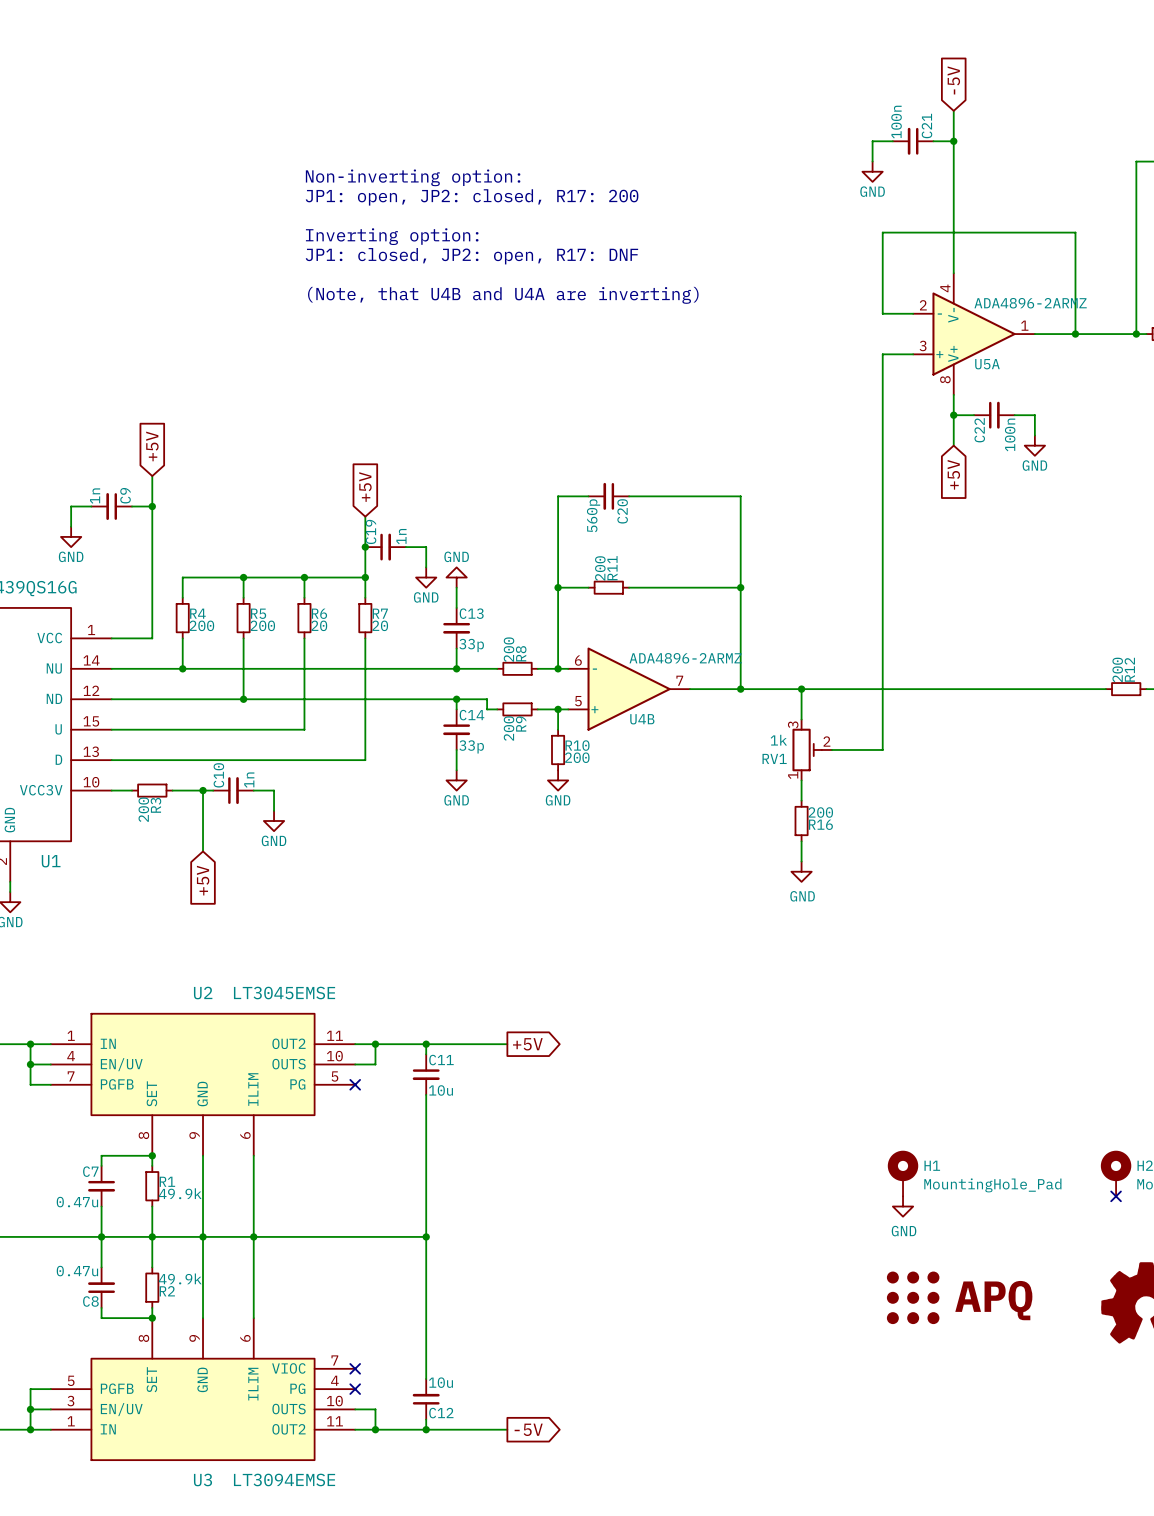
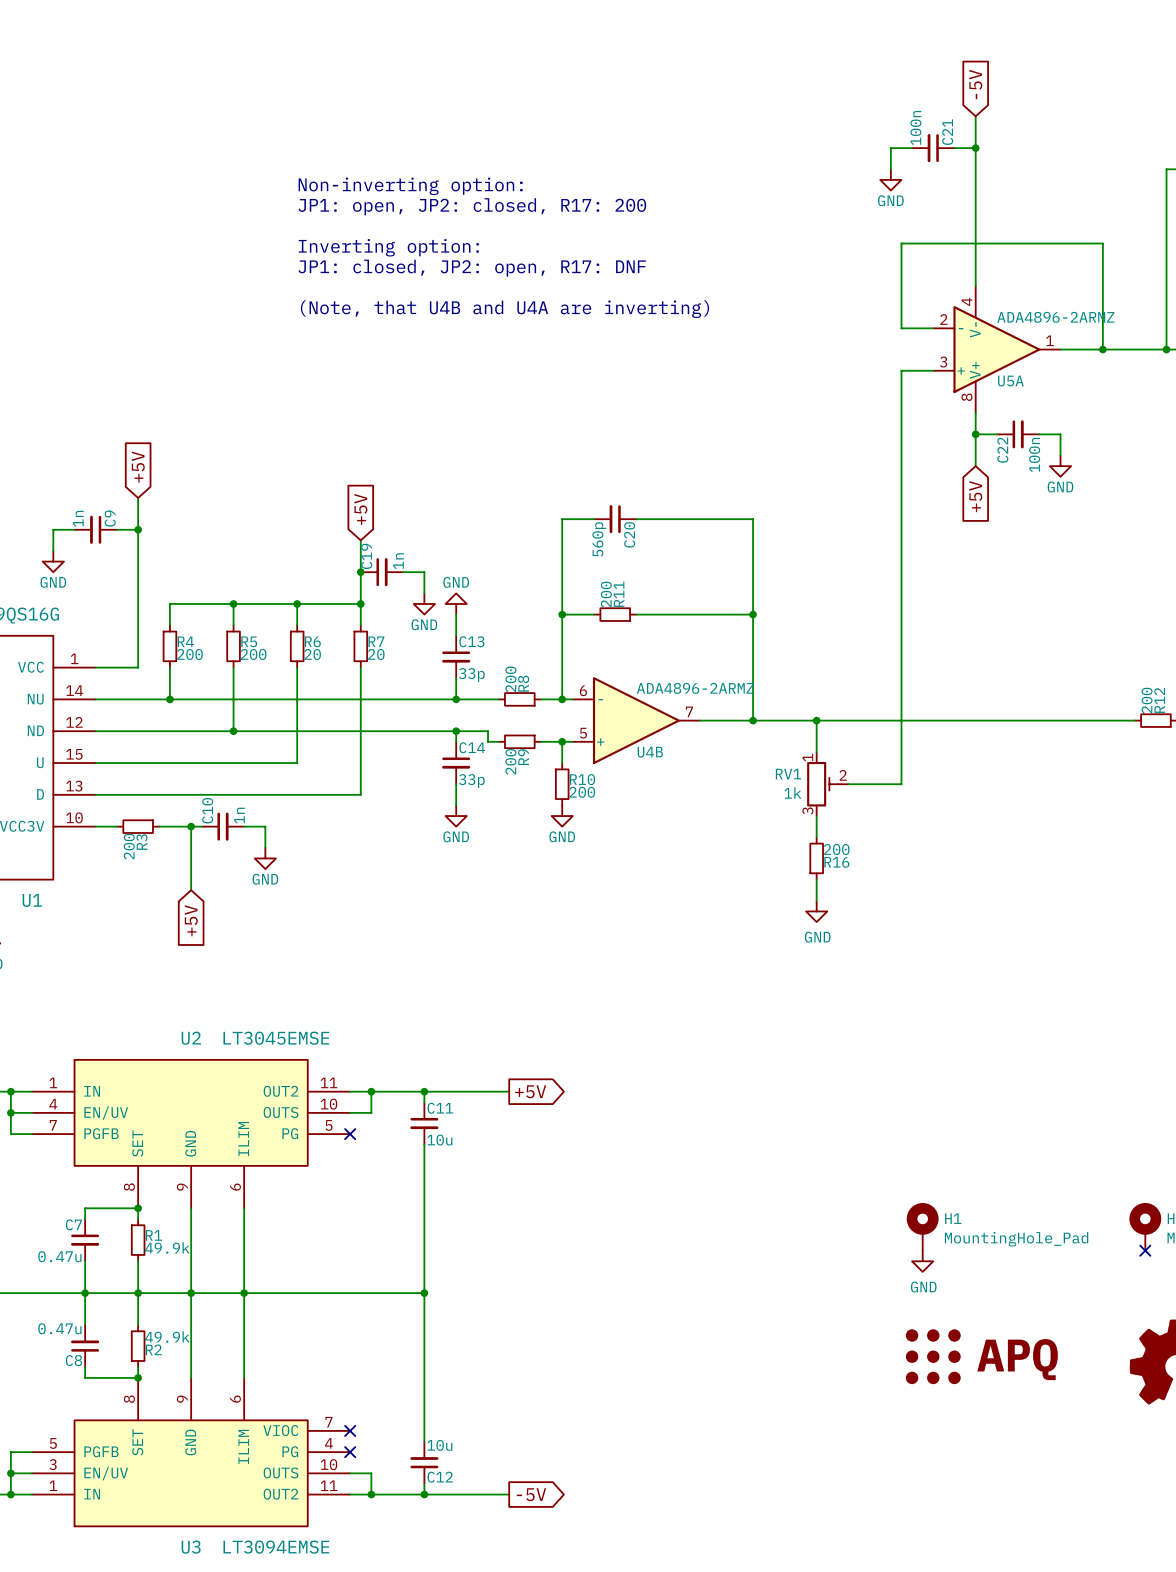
RV1 flip: as is (807, 749) -> up-down (822, 784)

